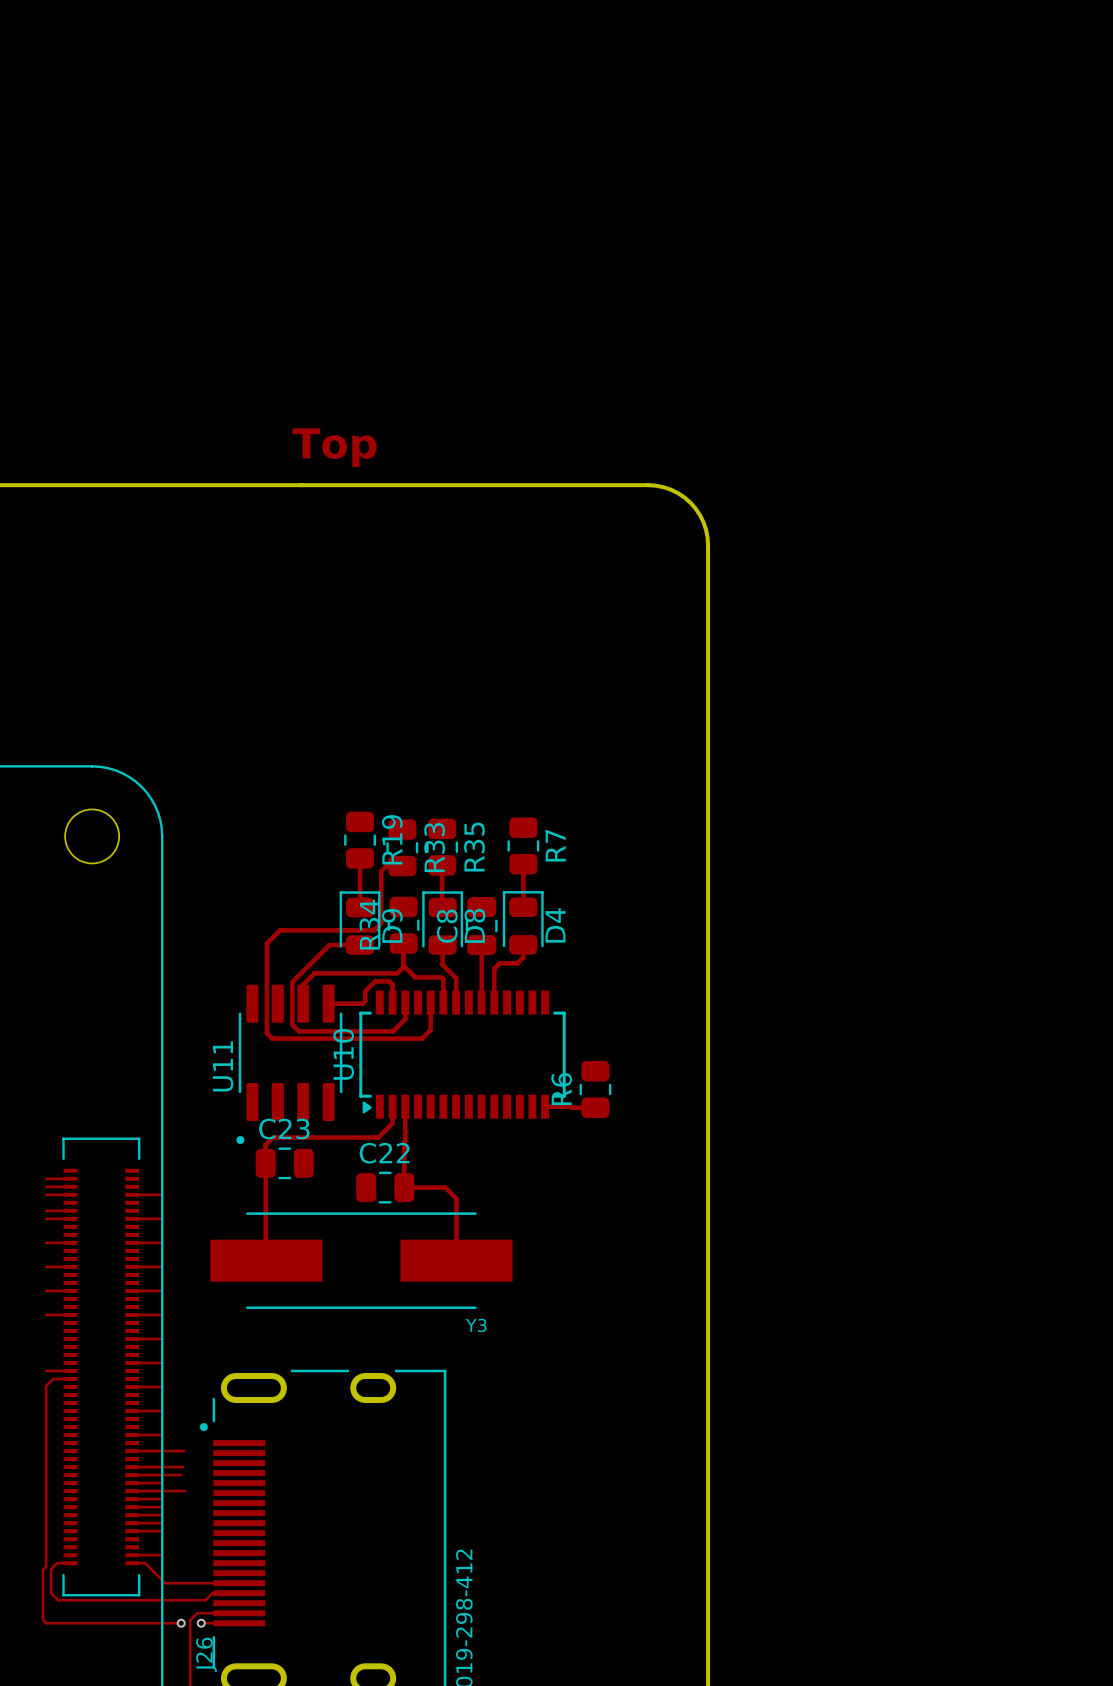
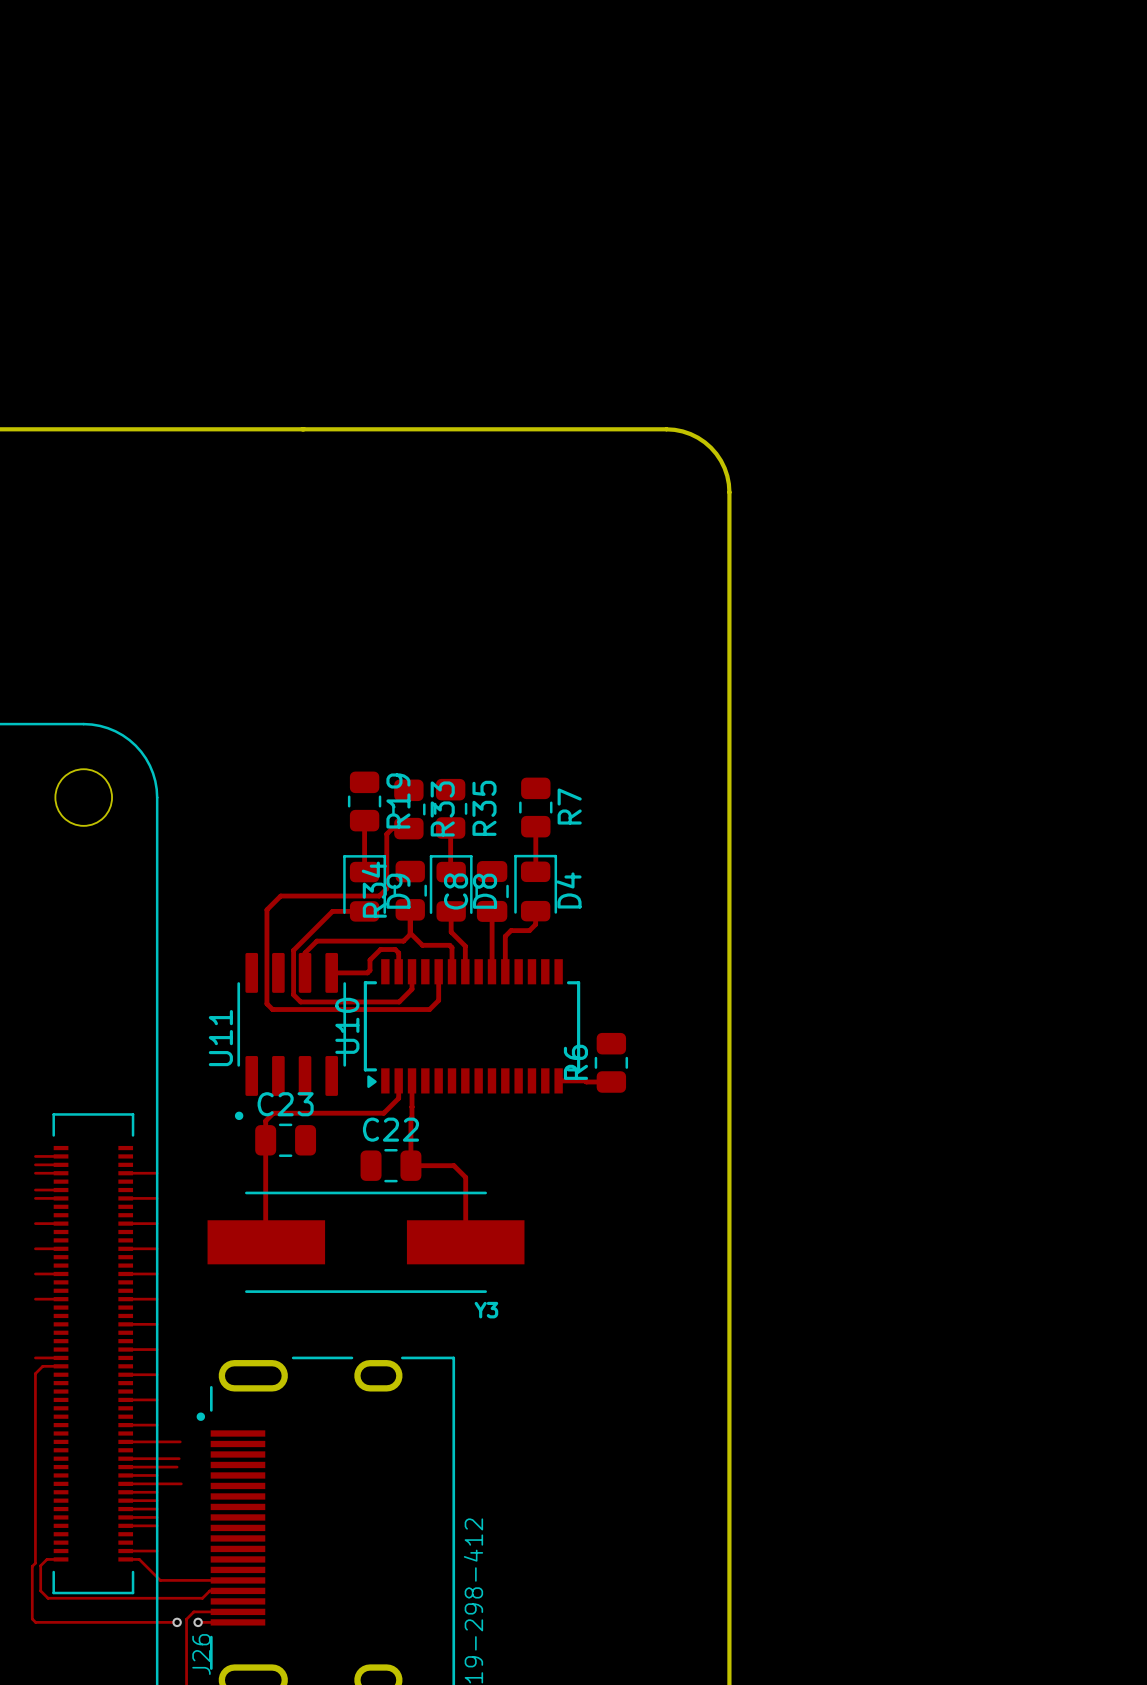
text: Top (334, 447) -> none

